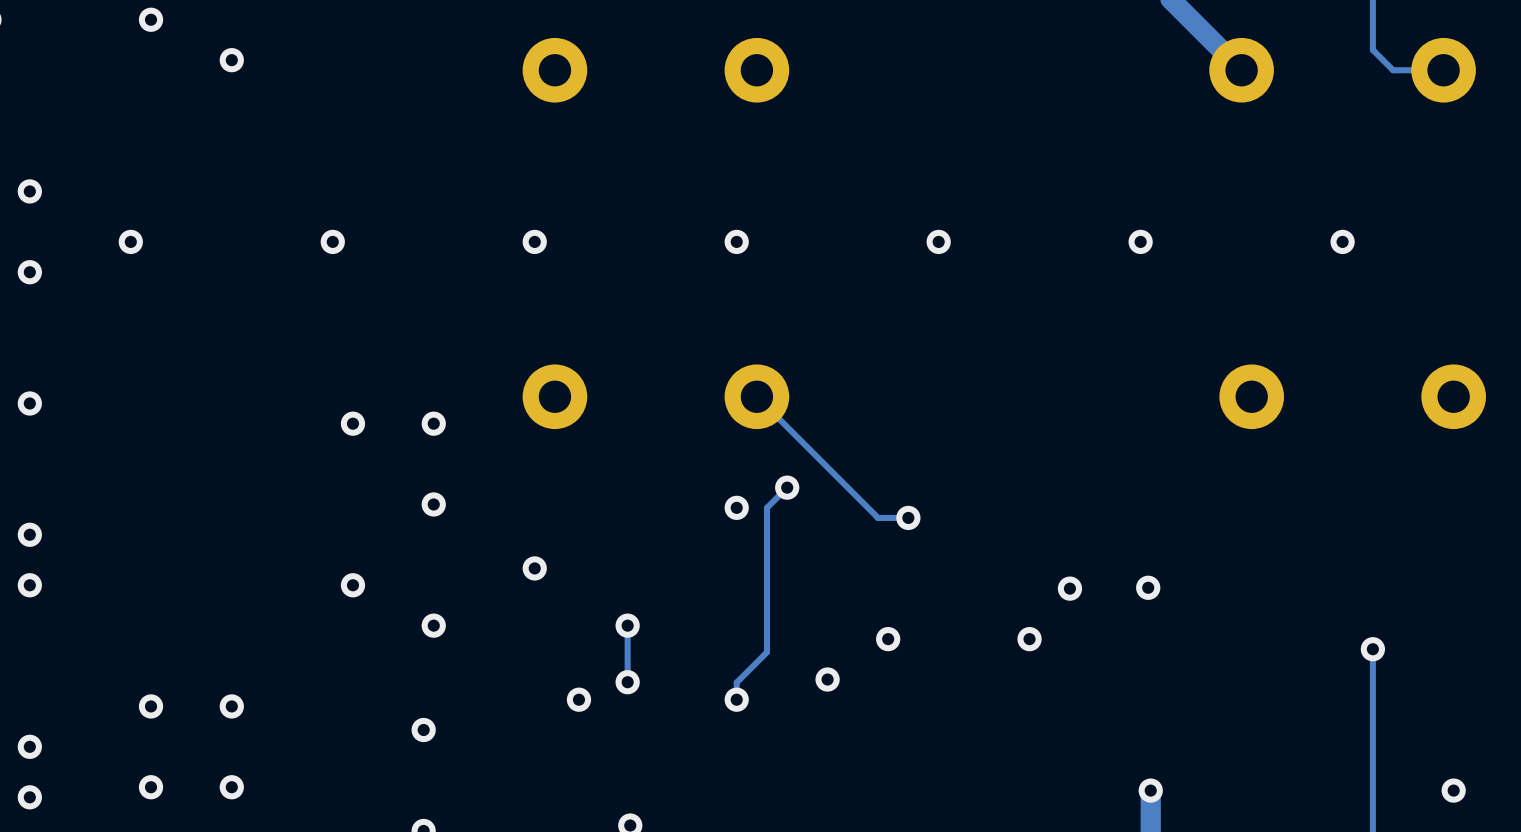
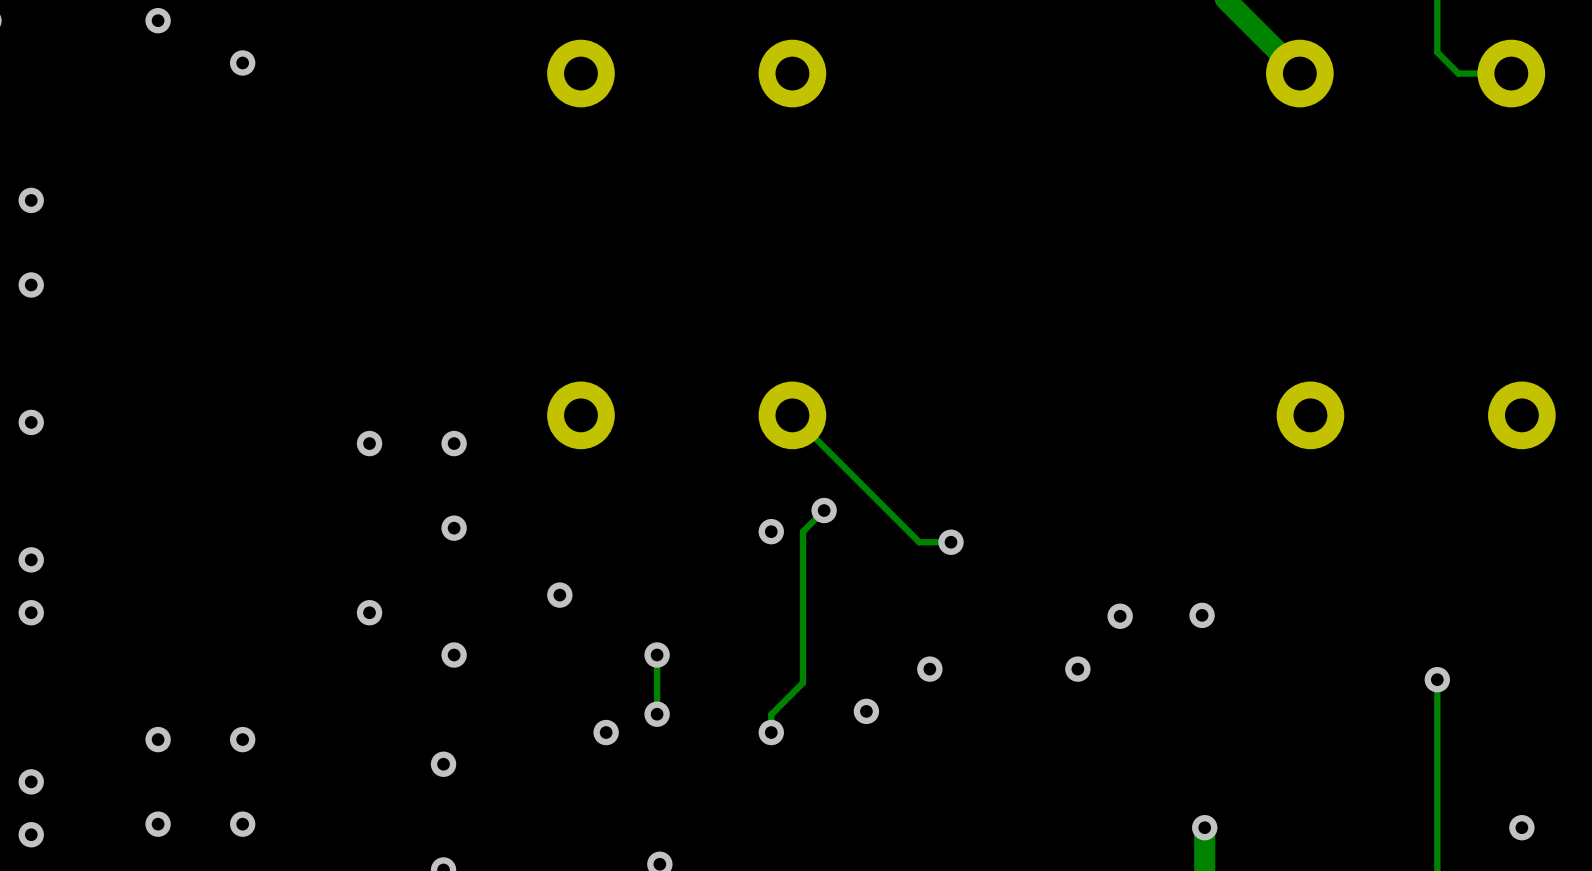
via: (130, 241) -> none
via: (332, 241) -> none
via: (534, 241) -> none
via: (736, 241) -> none
via: (938, 241) -> none
via: (1140, 241) -> none
via: (1342, 241) -> none

